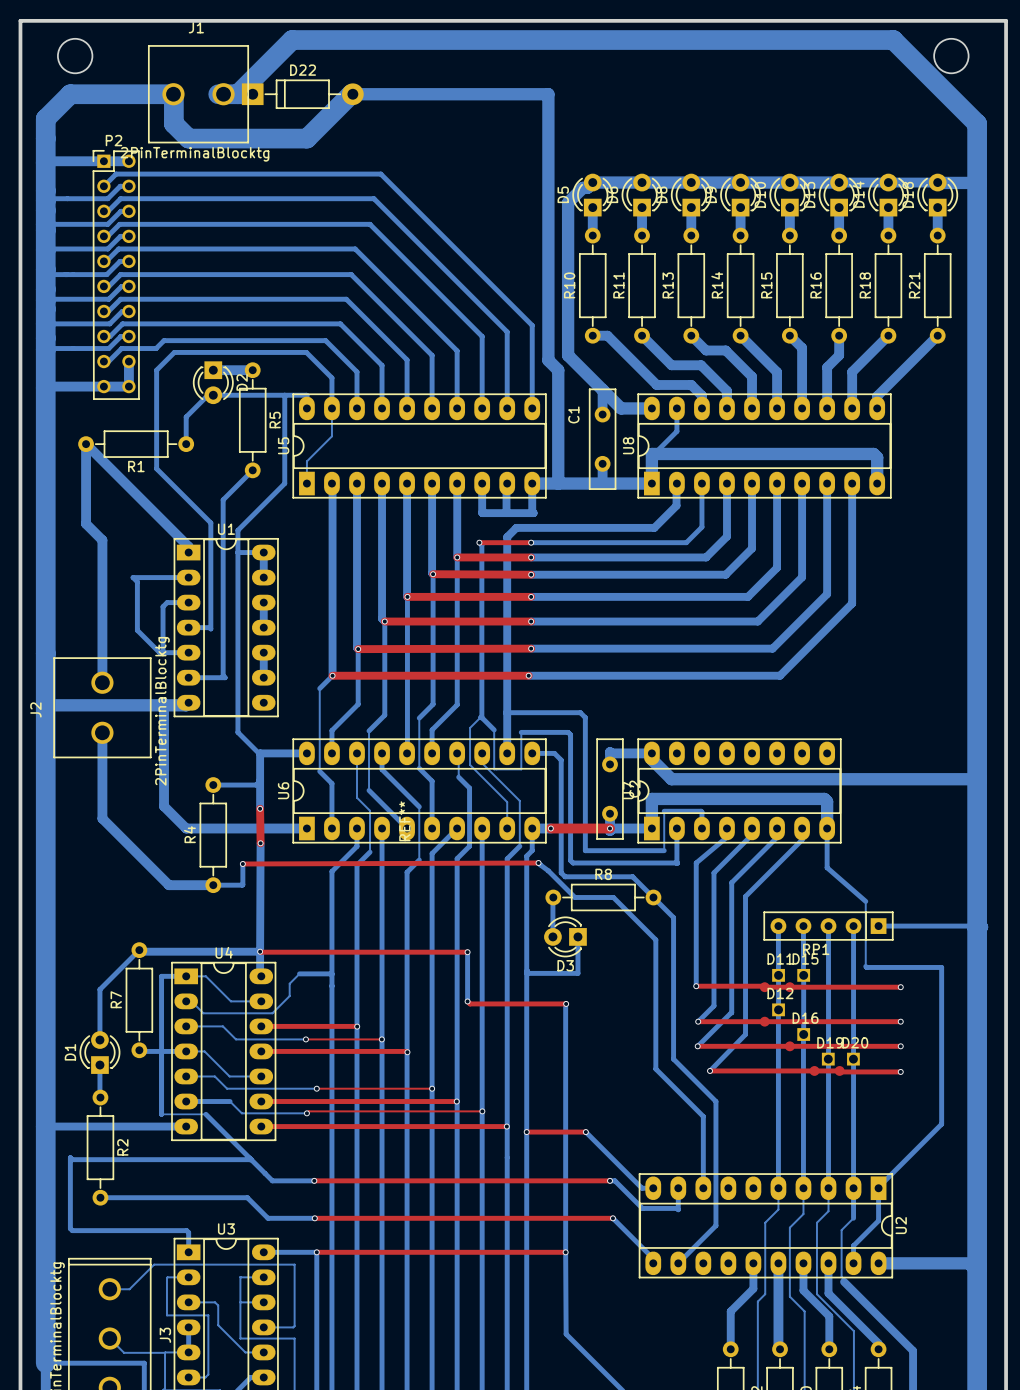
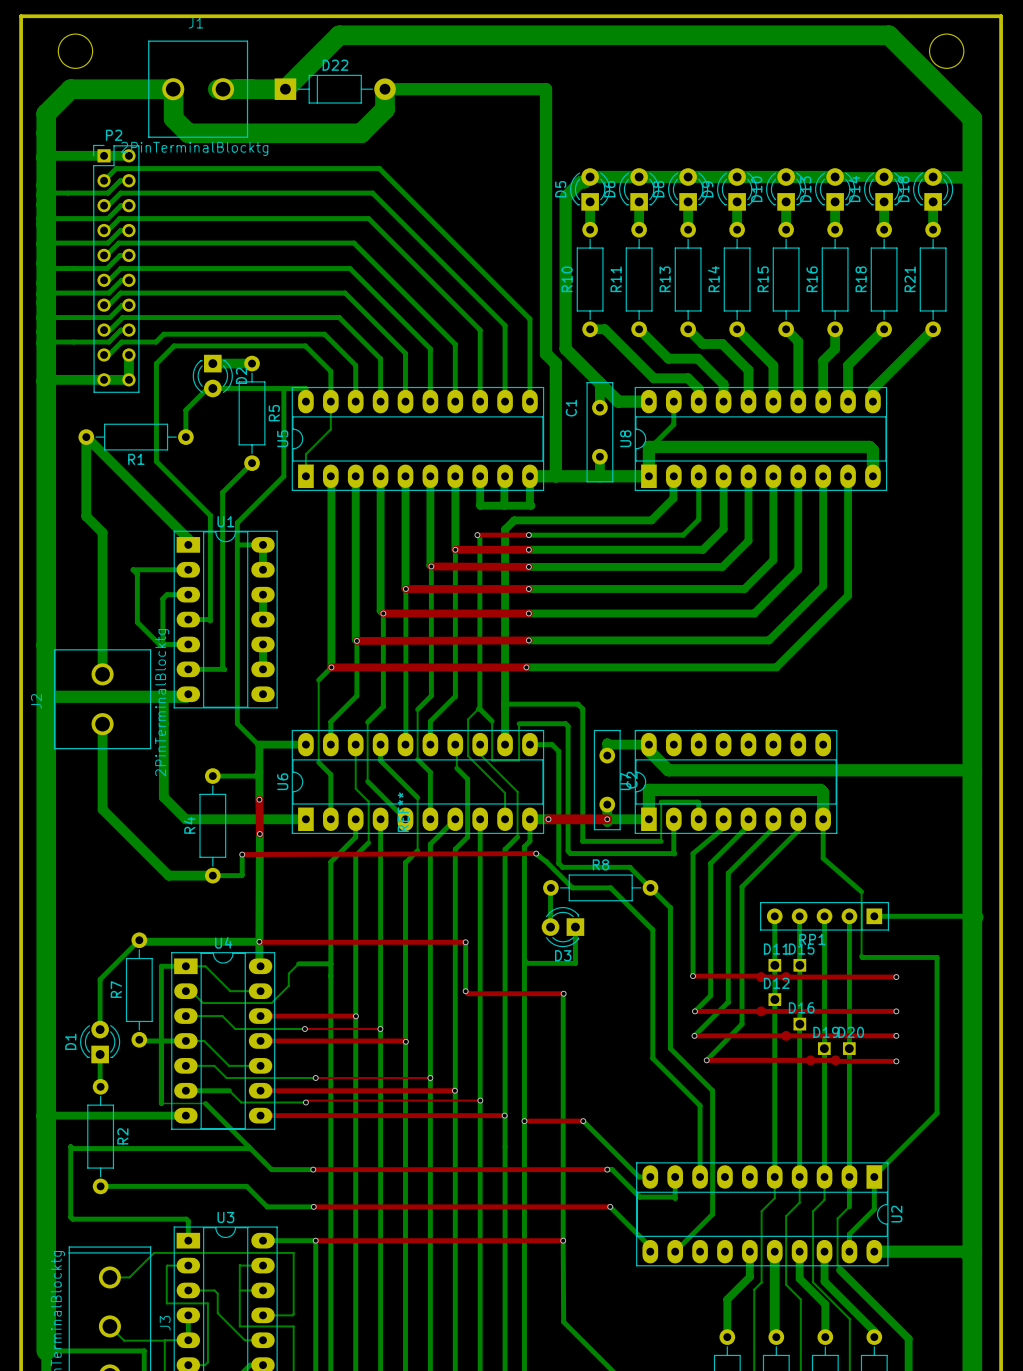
bottom track: (340, 40) (292, 40) (237, 94) -> (339, 35) (285, 89) (252, 89)
D22 position: (302, 94) -> (335, 89)
bottom track: (386, 94) (351, 94) (306, 138) -> (385, 89) (385, 109) (361, 133) (305, 133)

